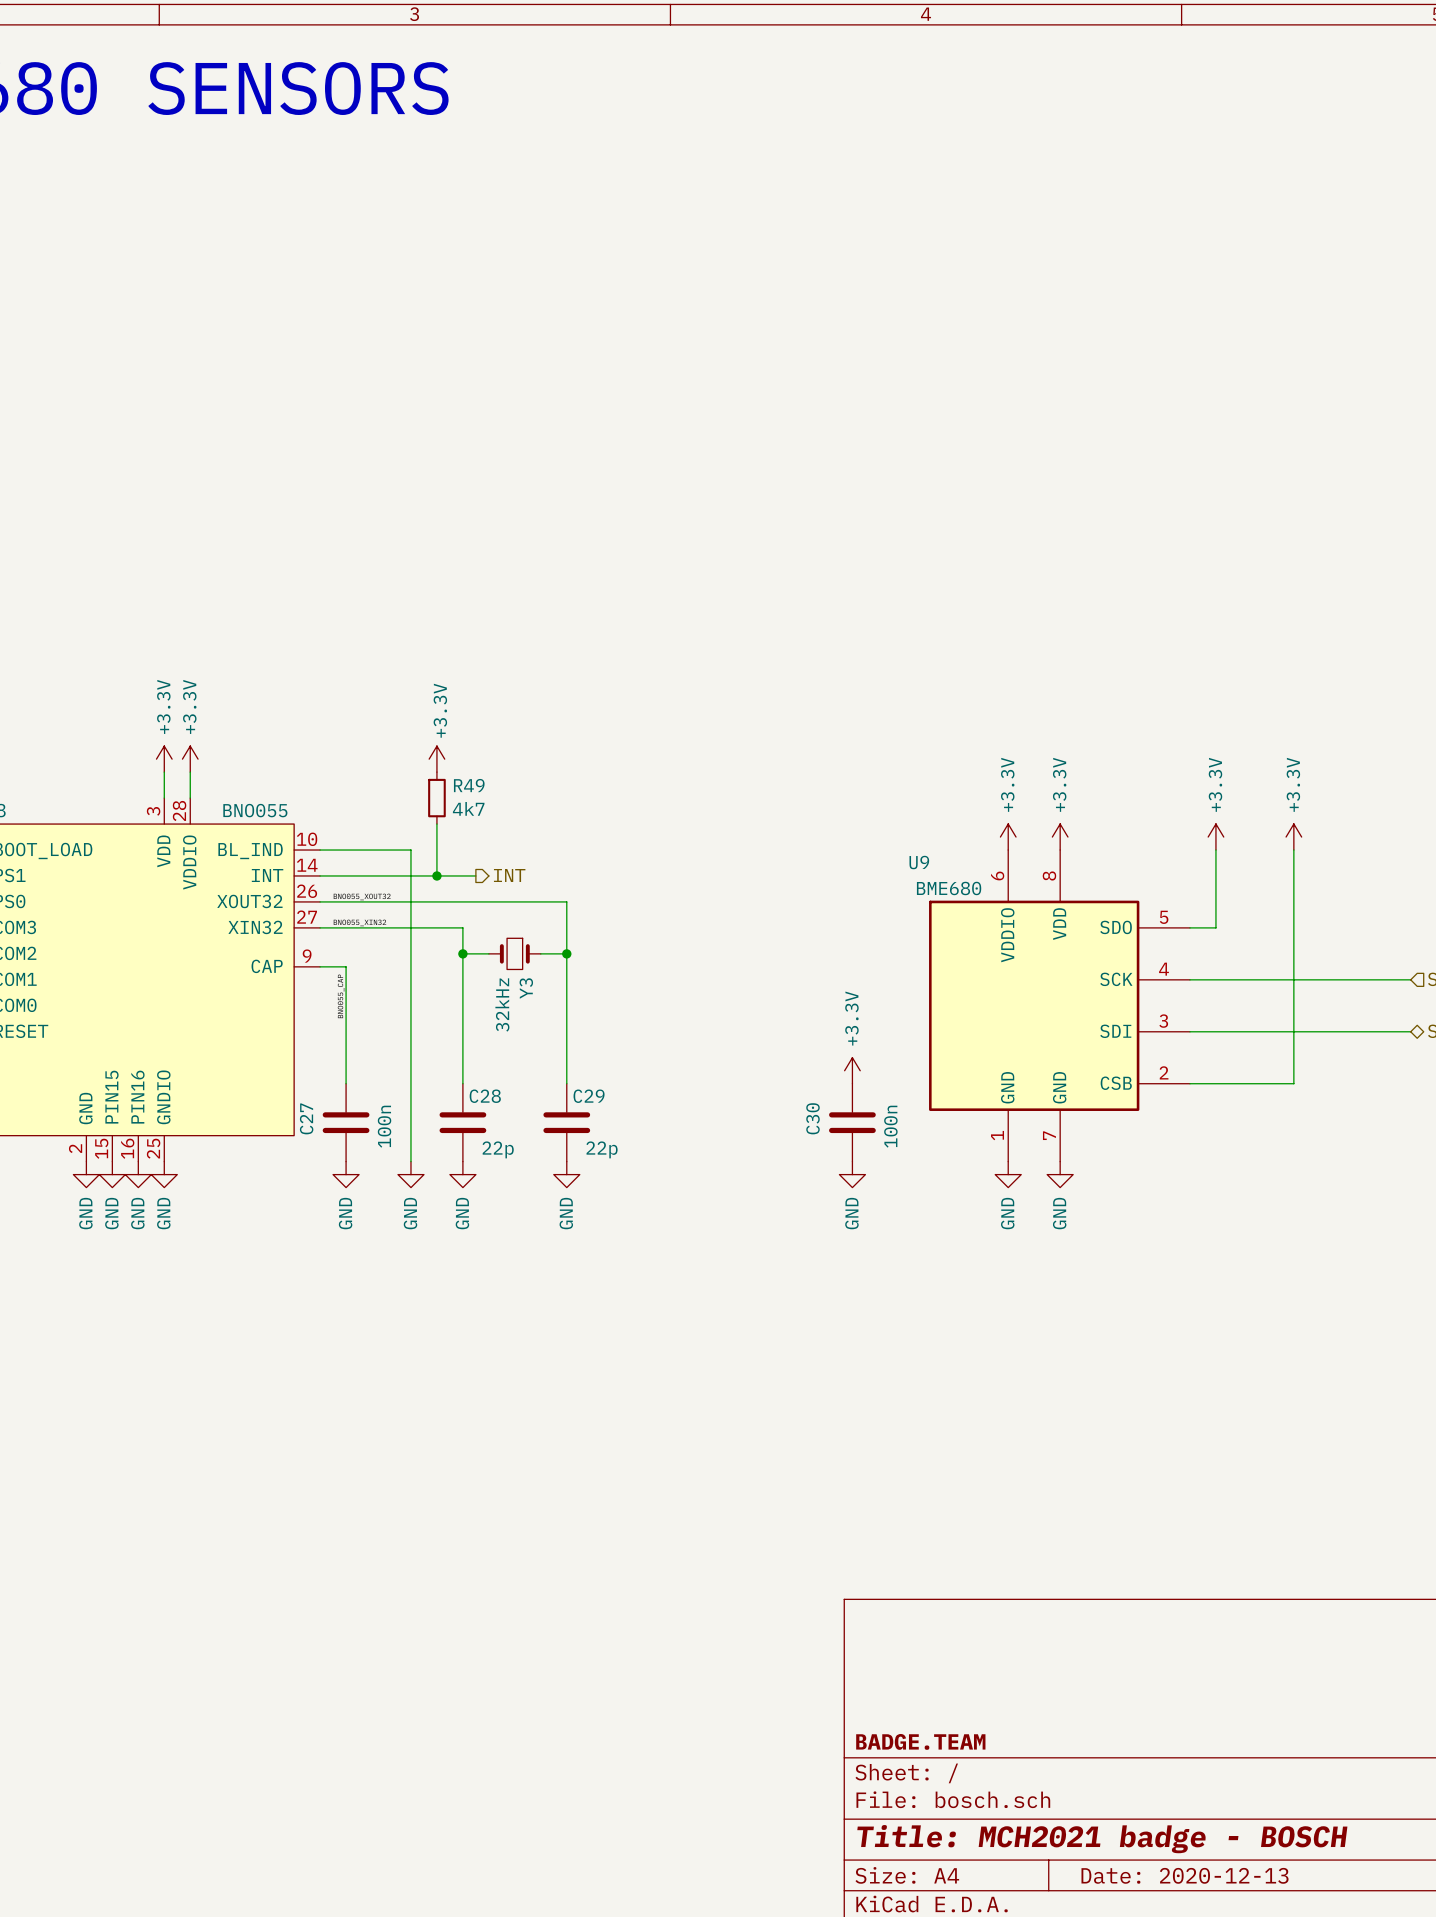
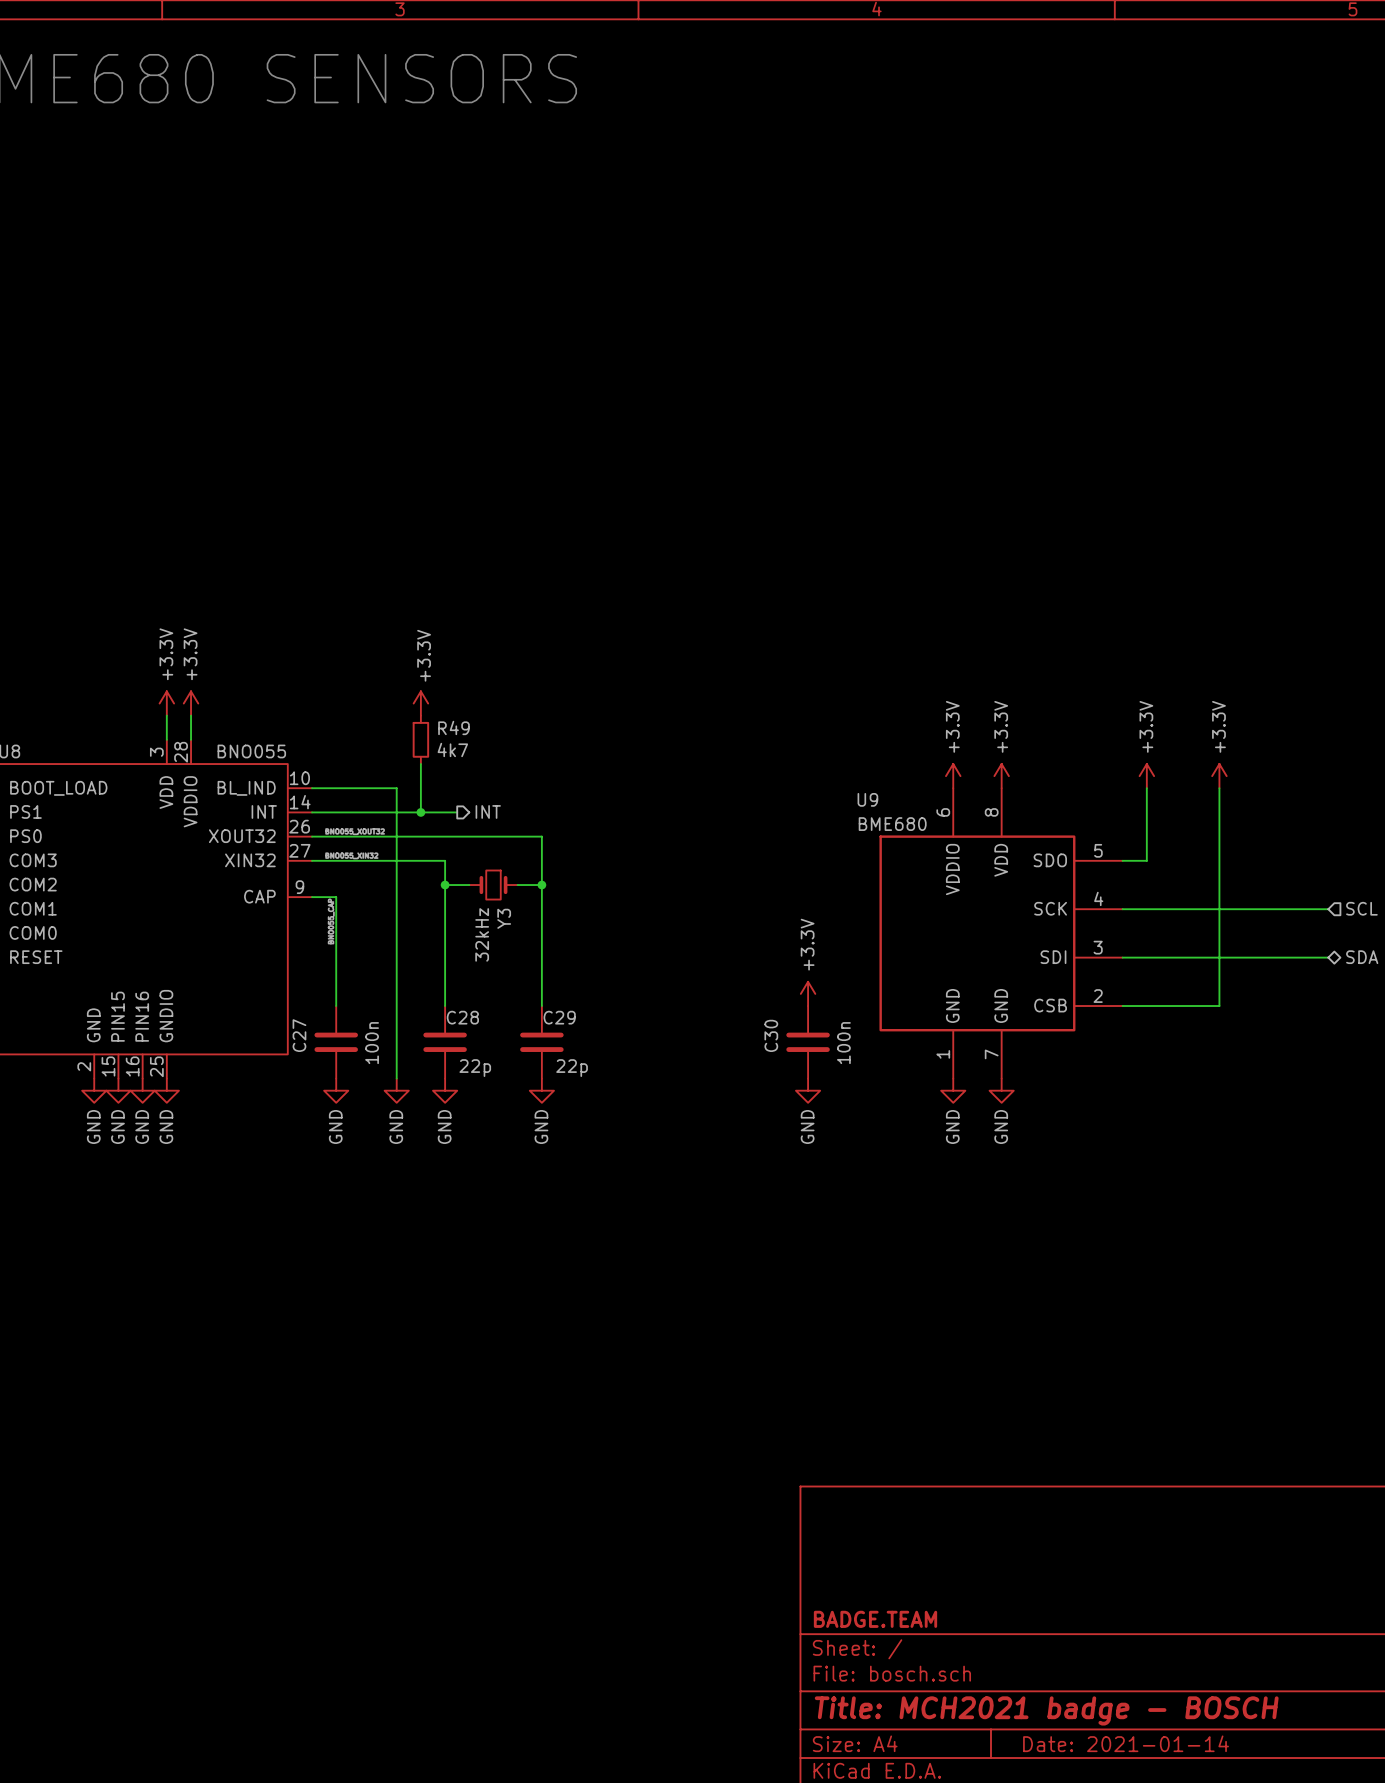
title block: Date: 2020-12-13 (1185, 1875) -> Date: 2021-01-14 (1126, 1743)

